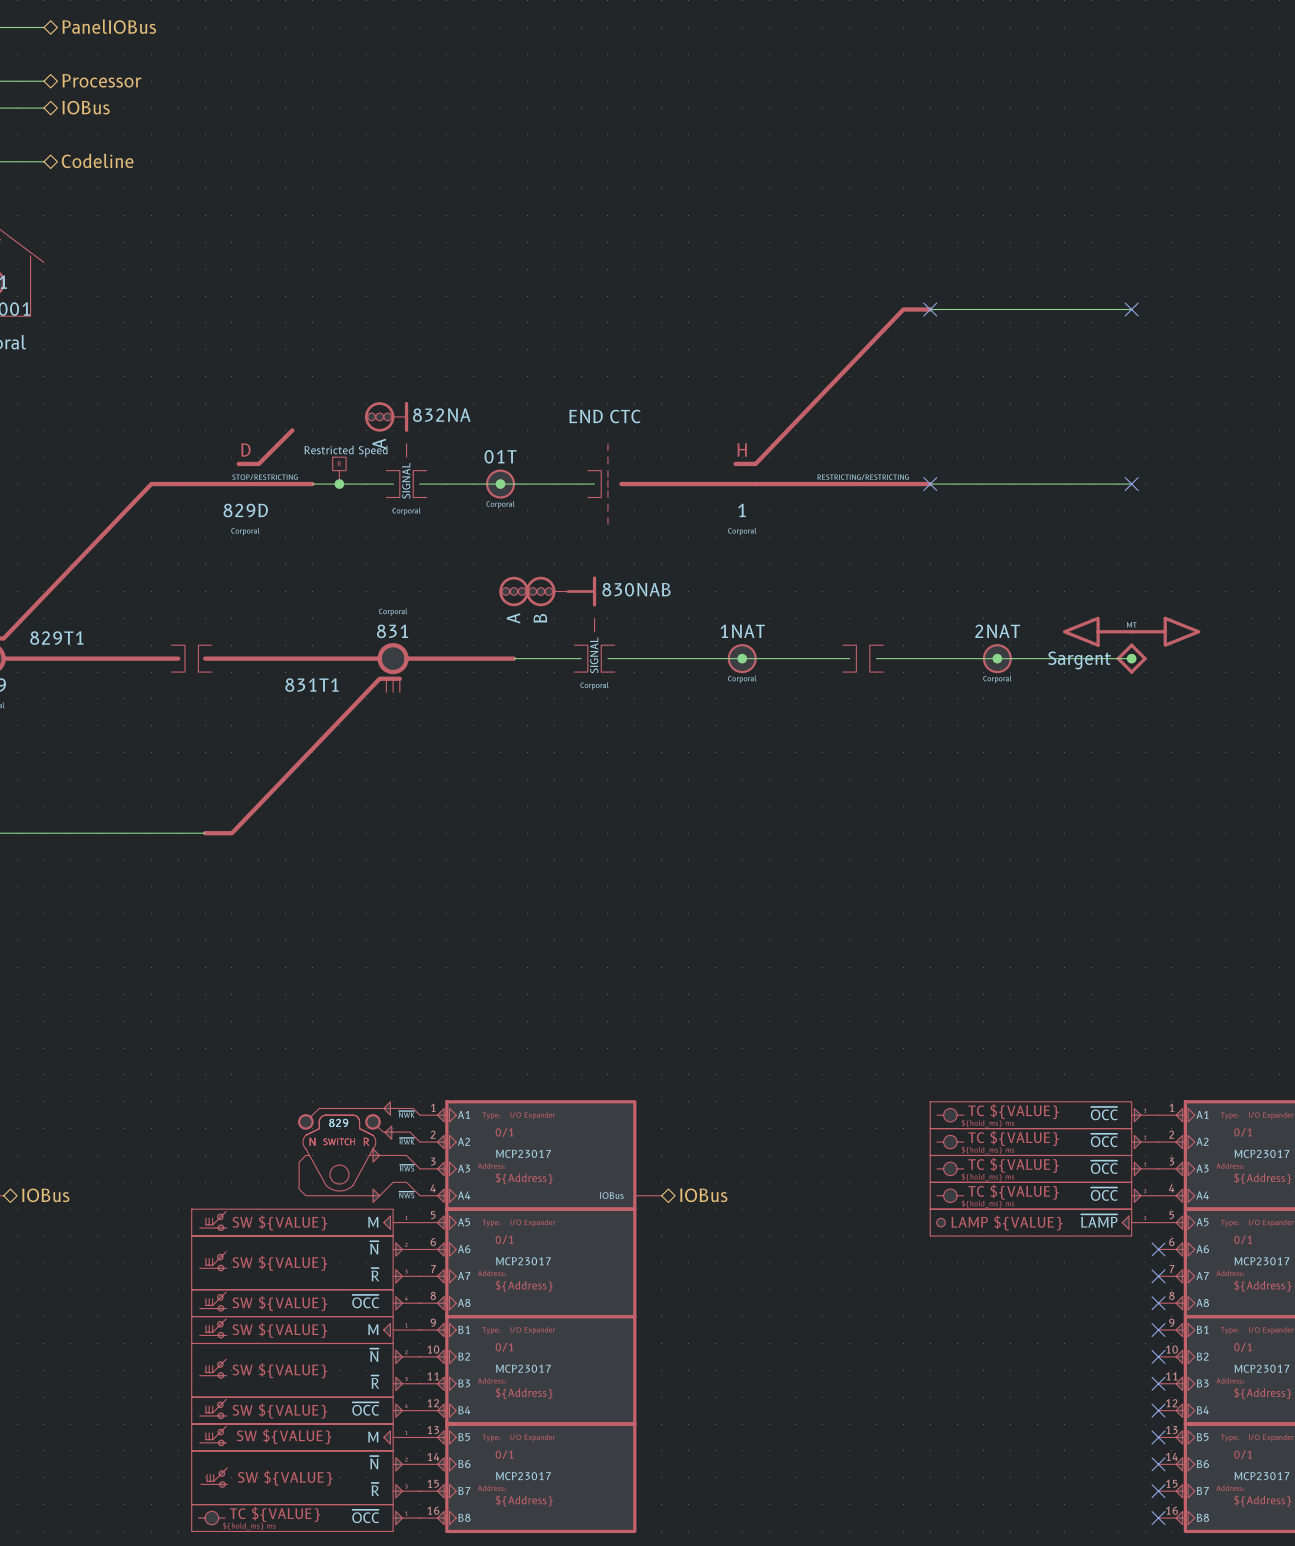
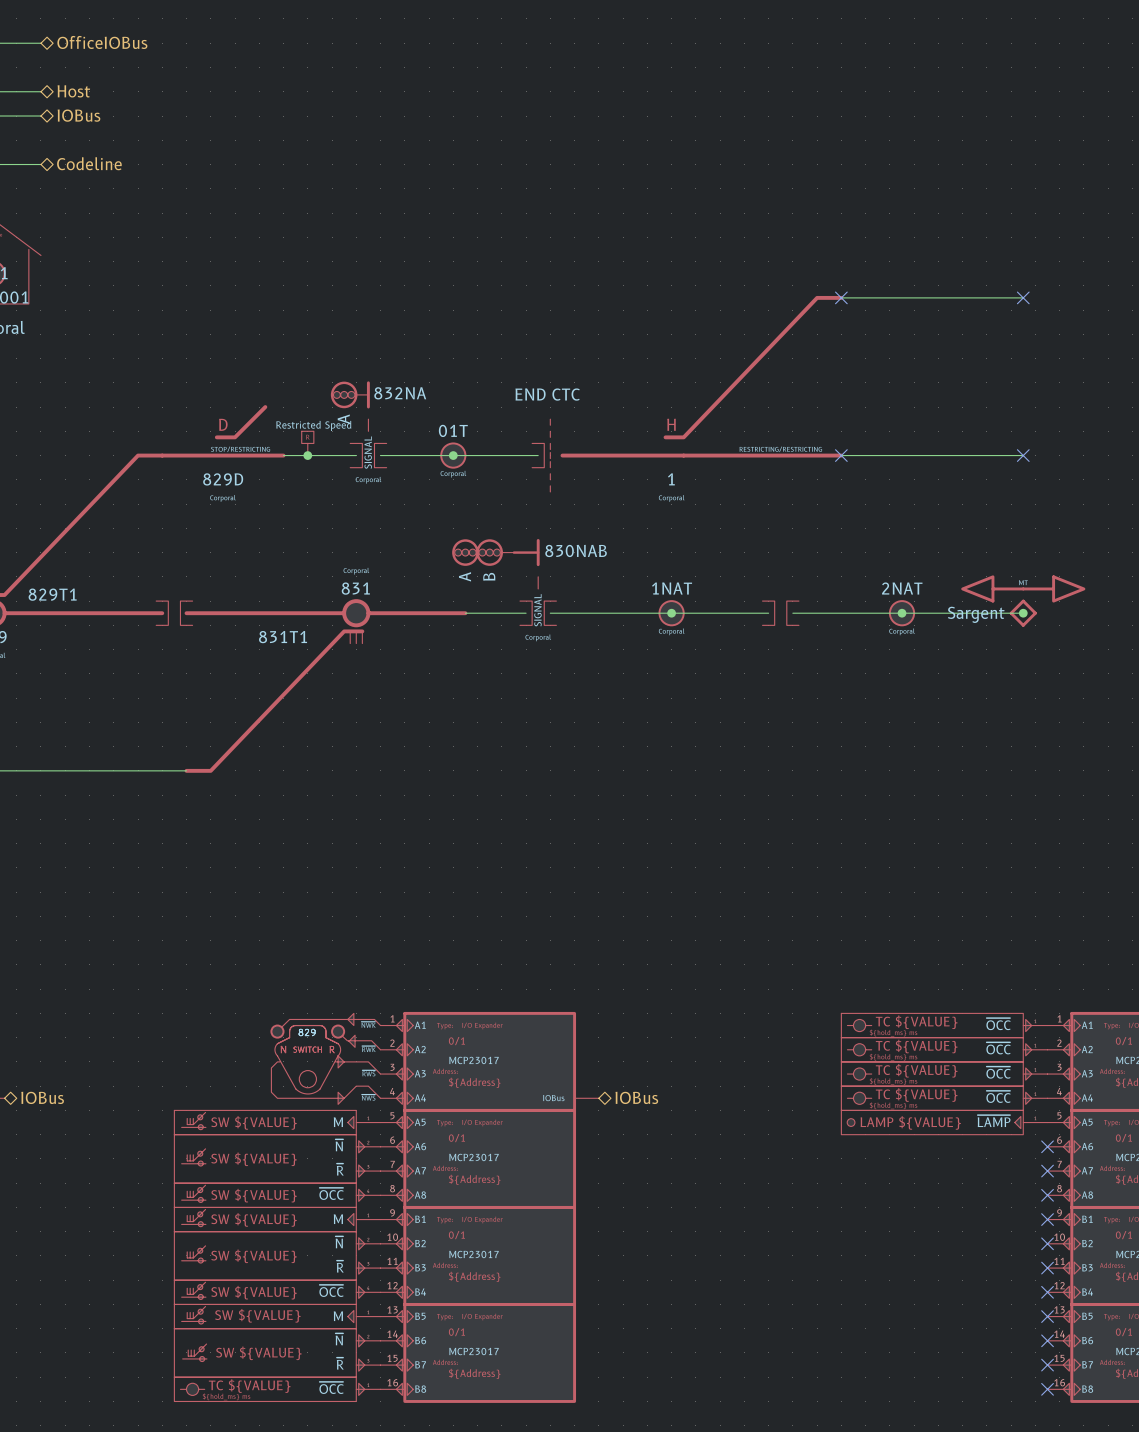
hierarchical label: PanelIOBus (109, 26) -> OfficeIOBus (102, 42)
hierarchical label: Processor (101, 80) -> Host (73, 91)

